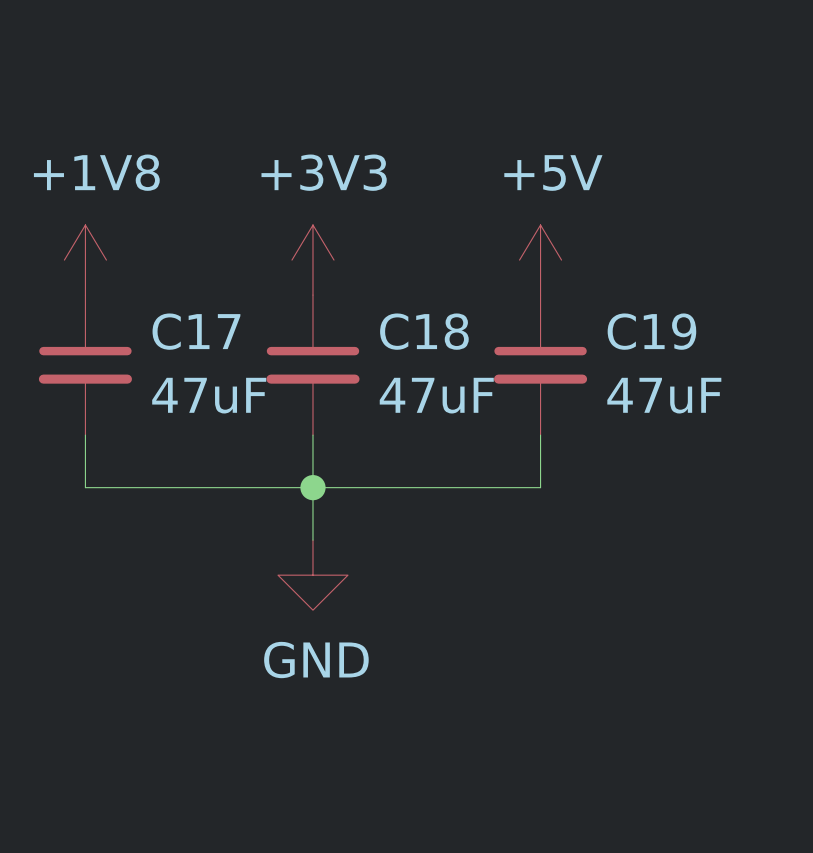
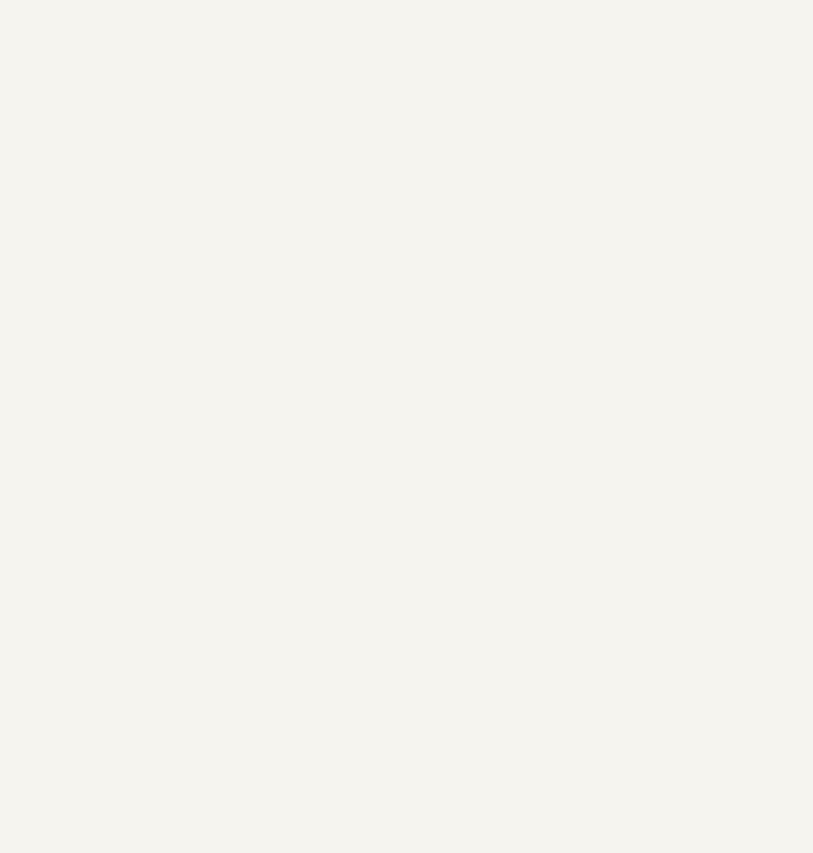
power symbol: +1V8 (85, 260) -> none
power symbol: +3V3 (312, 260) -> none
power symbol: +5V (540, 260) -> none
C17: 47uF (85, 365) -> none
C18: 47uF (312, 365) -> none
C19: 47uF (540, 365) -> none
wire: (85, 435) (85, 487) (540, 487) (540, 435) -> none
wire: (312, 435) (312, 540) -> none
junction: (312, 487) -> none
power symbol: GND (312, 575) -> none

